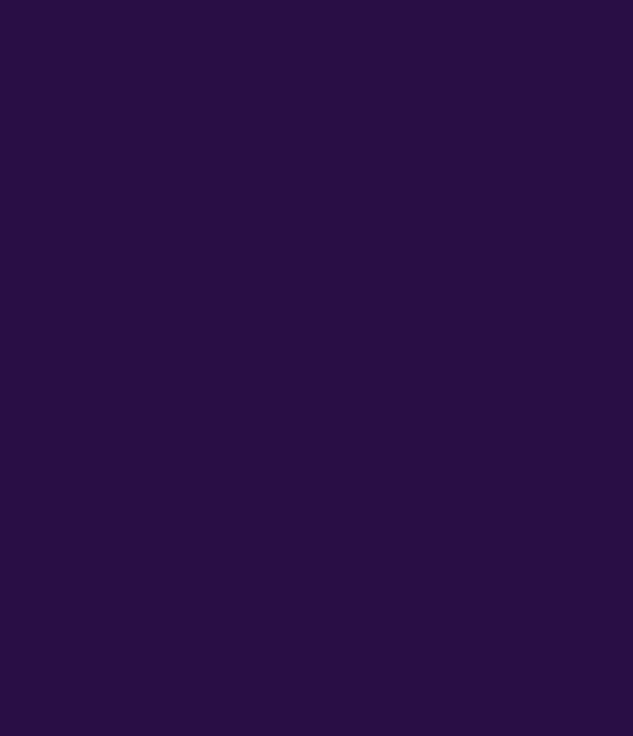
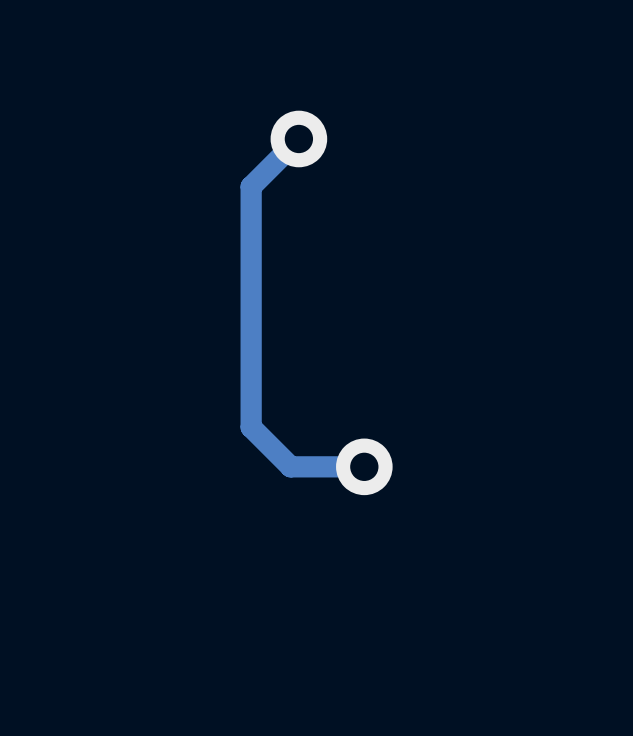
track: none -> (298, 138) (251, 186) (251, 427) (290, 466) (364, 466)
via: none -> (298, 138)
via: none -> (364, 466)

